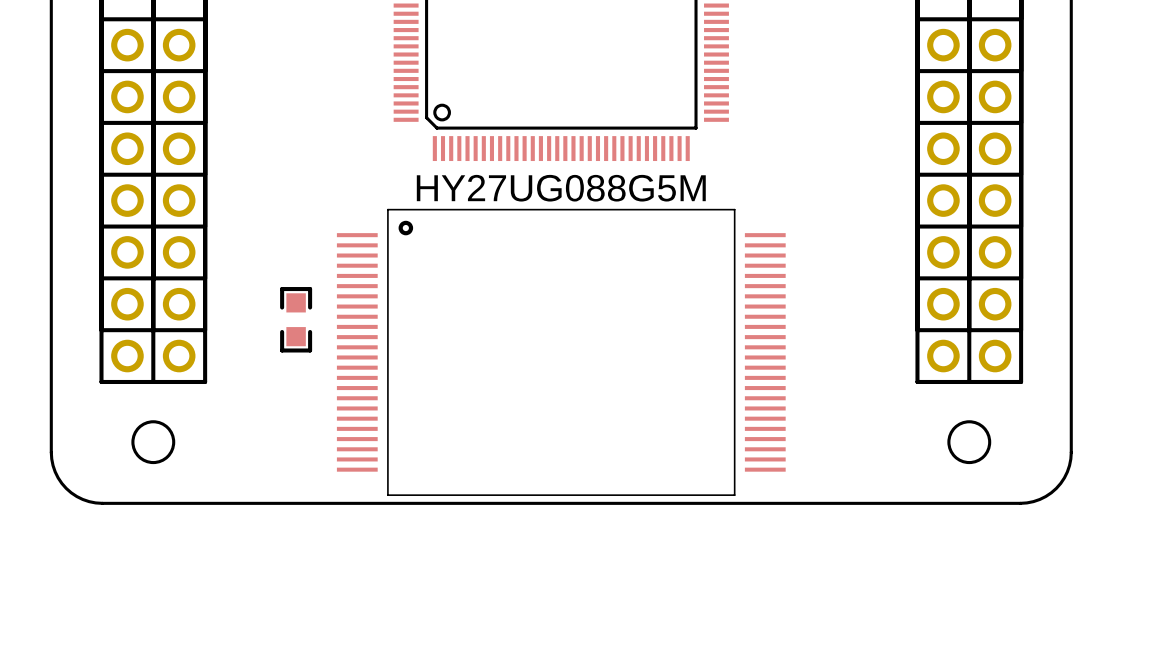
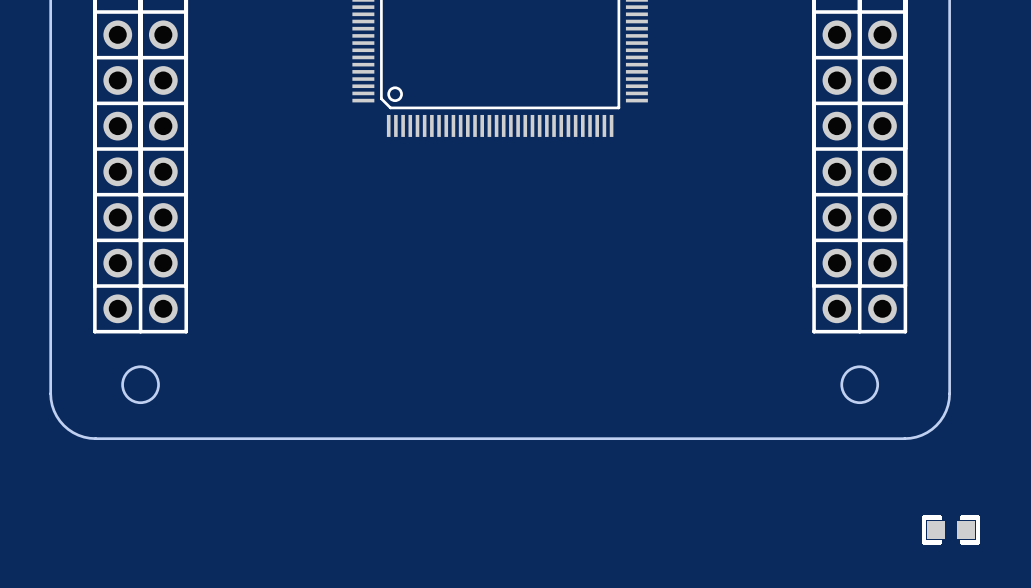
part: (296, 319) -> none
part: HY27UG088G5M (561, 352) -> none
part: none -> (950, 529)

